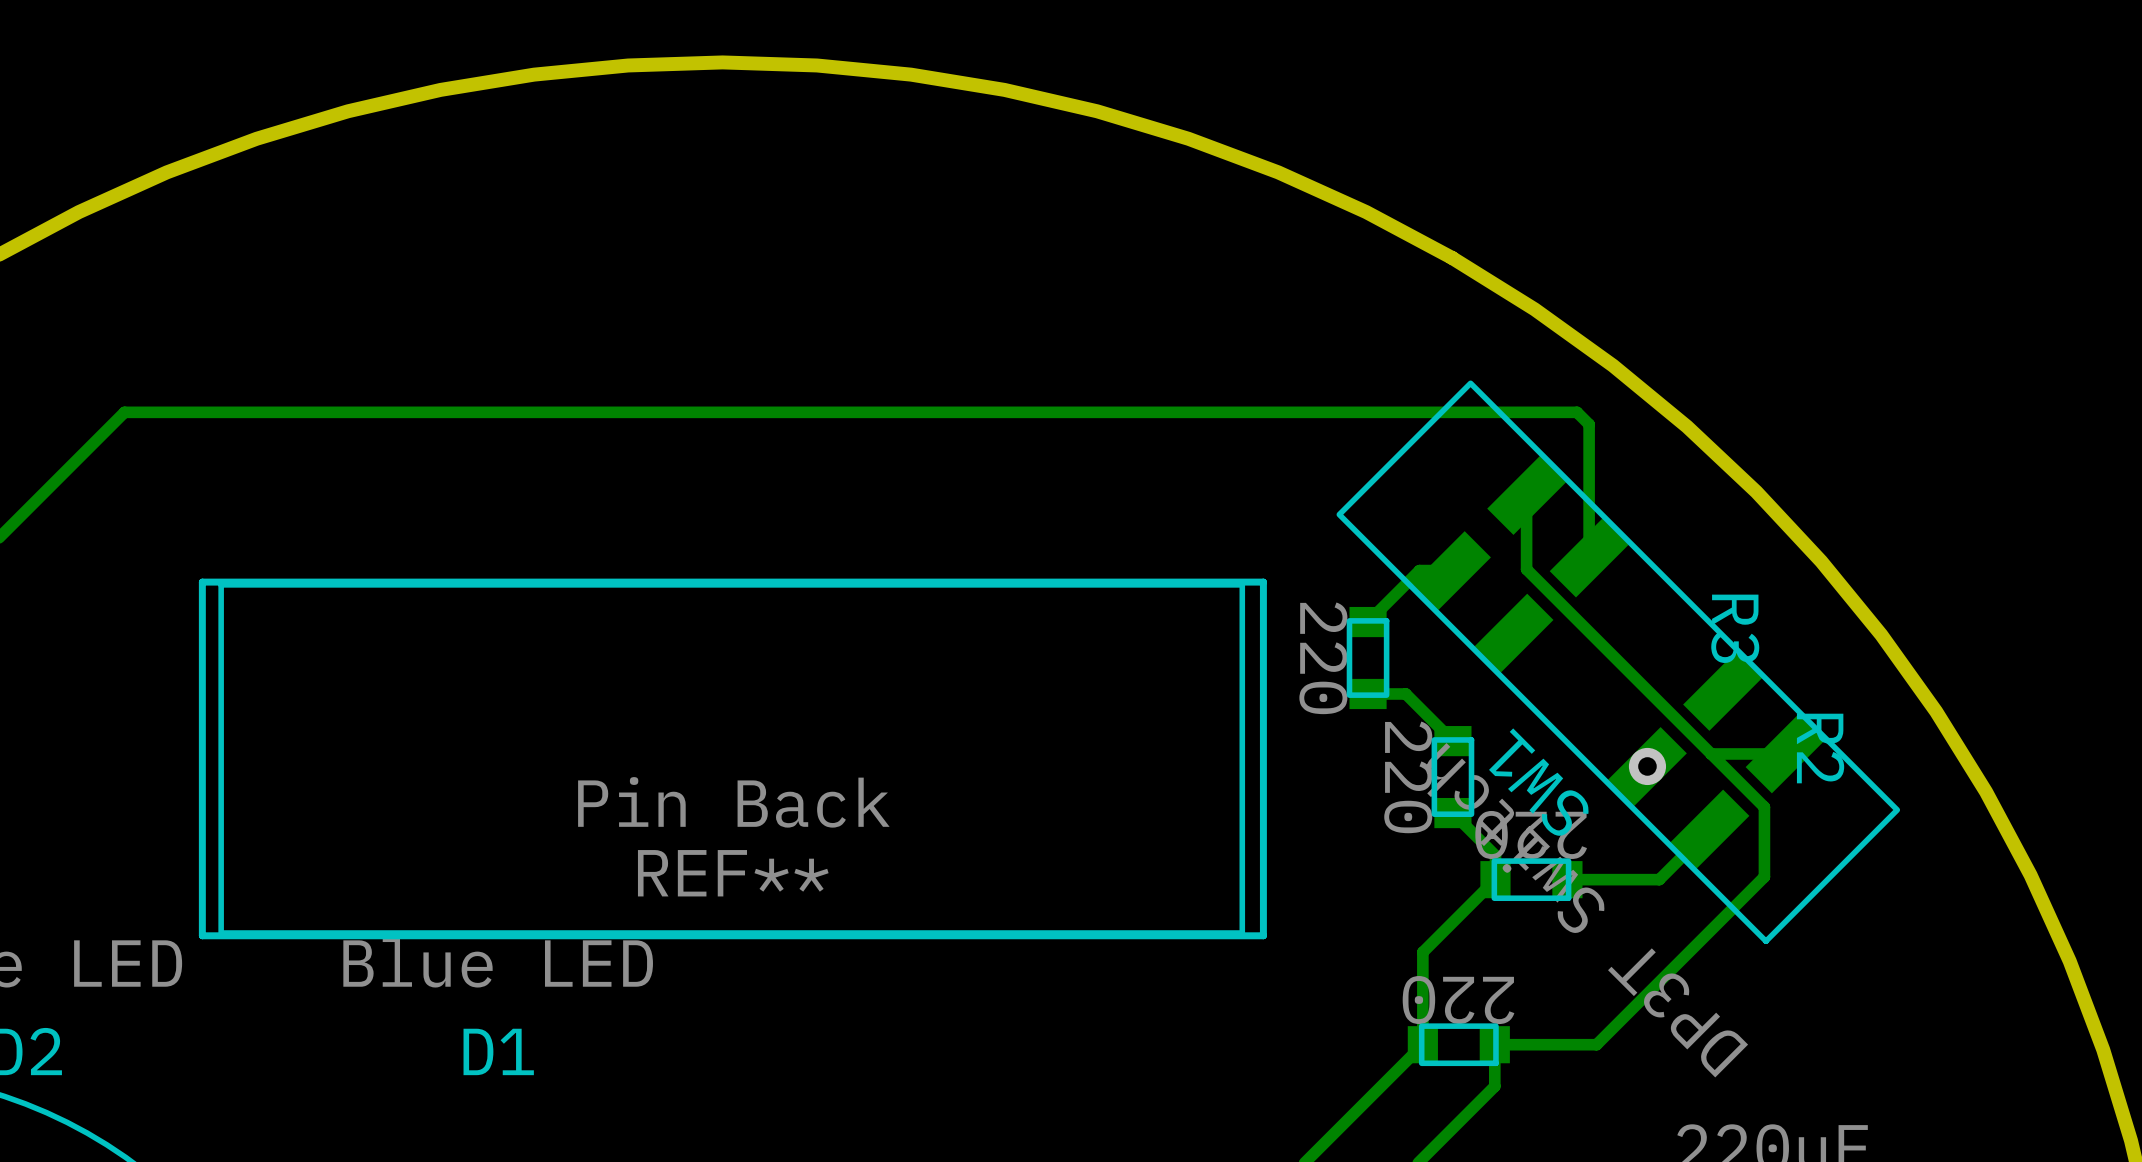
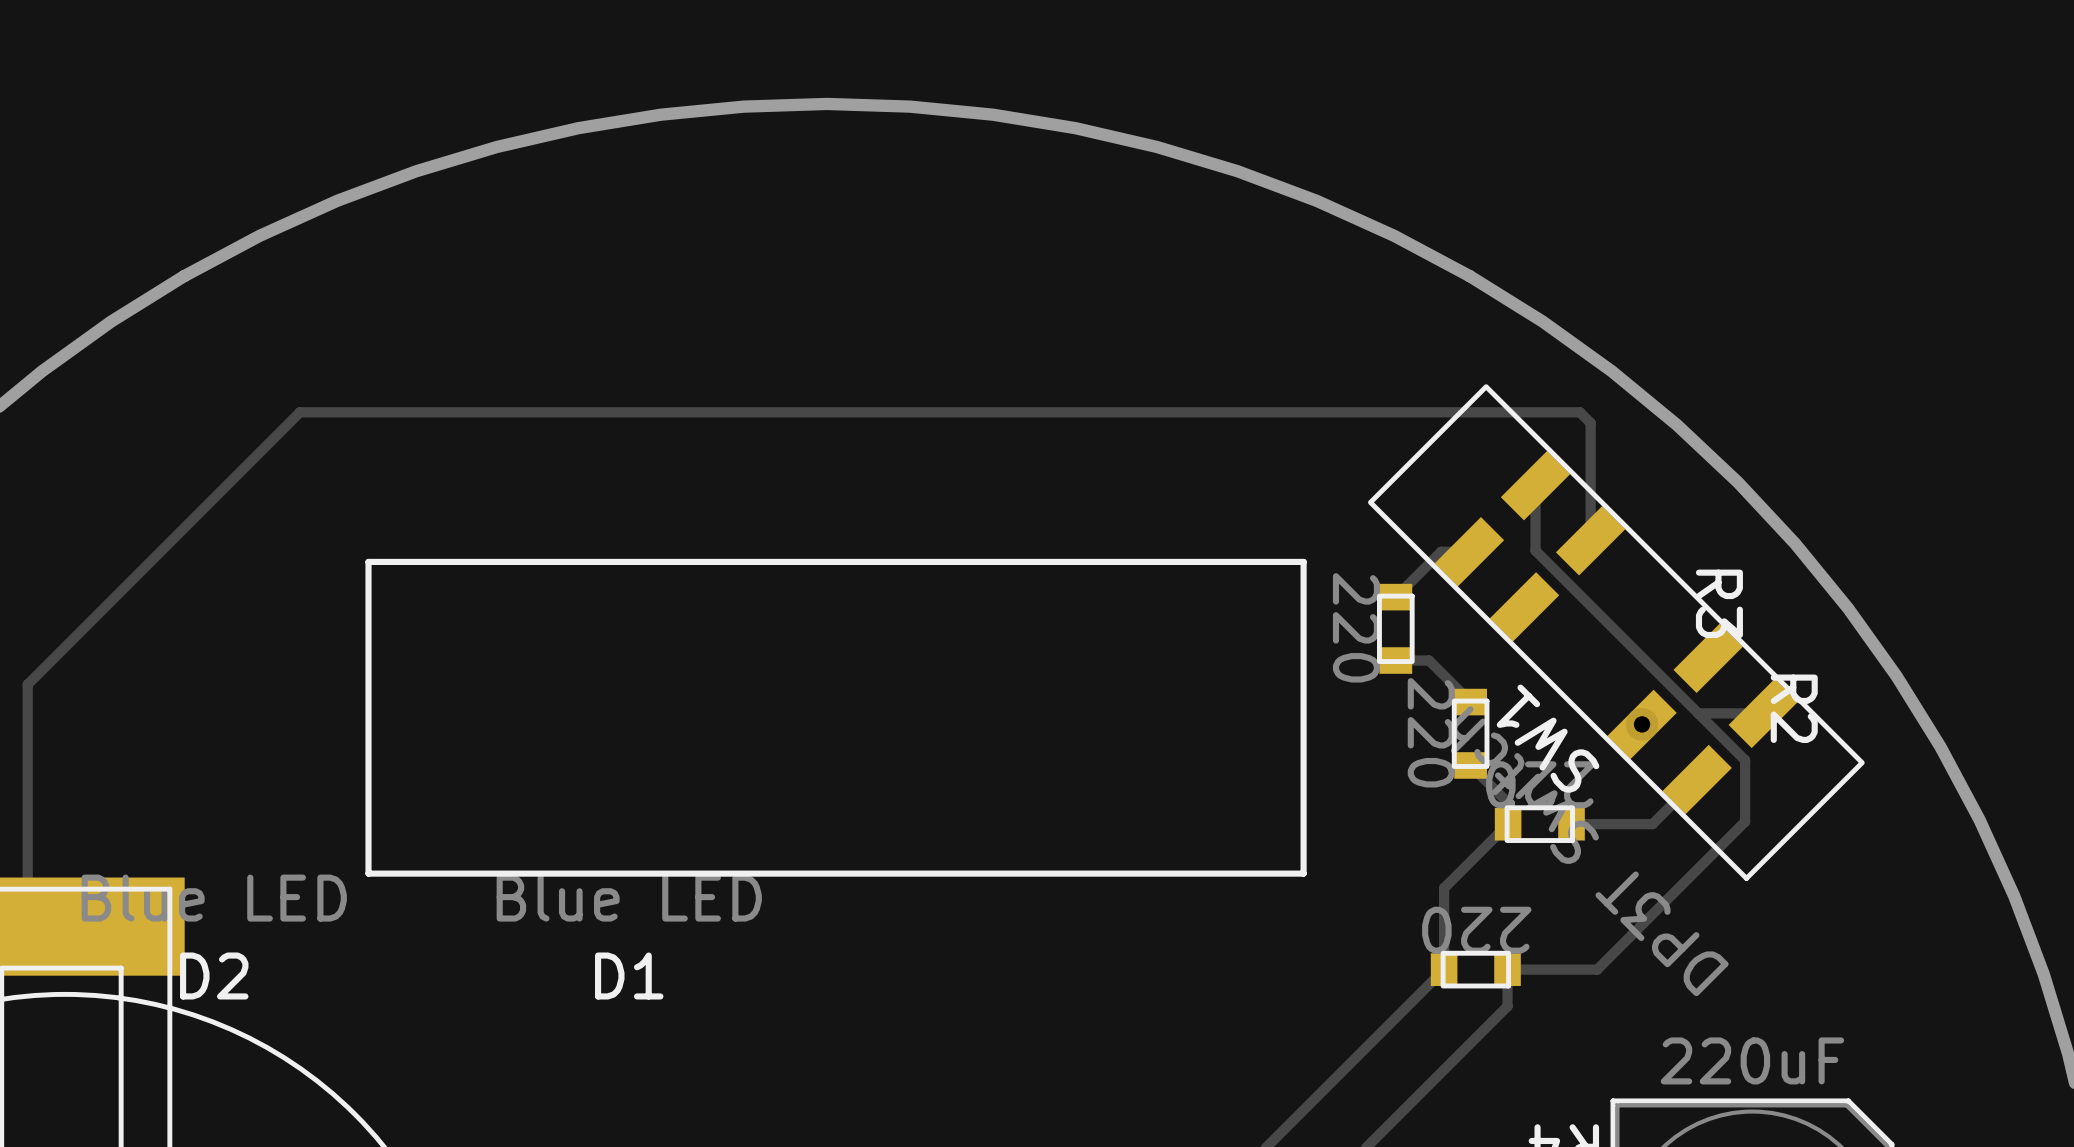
REF**: Pin Back (731, 758) -> none

